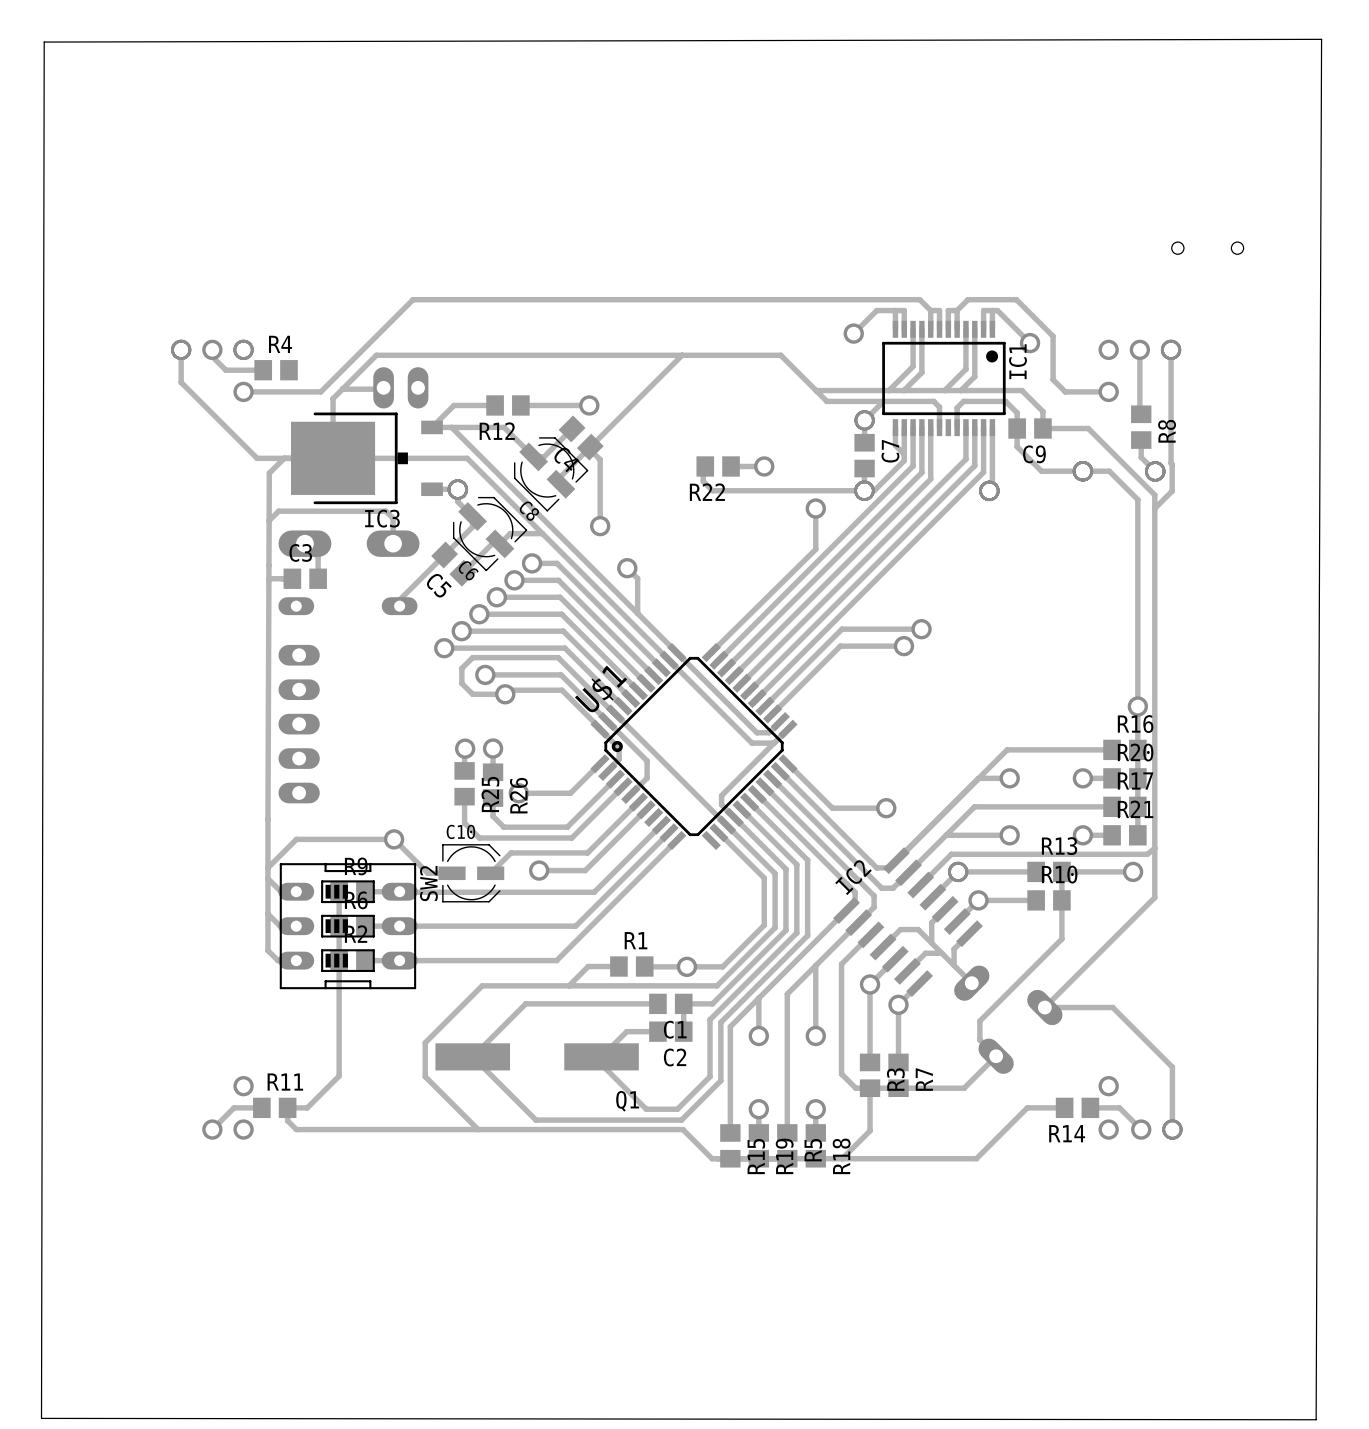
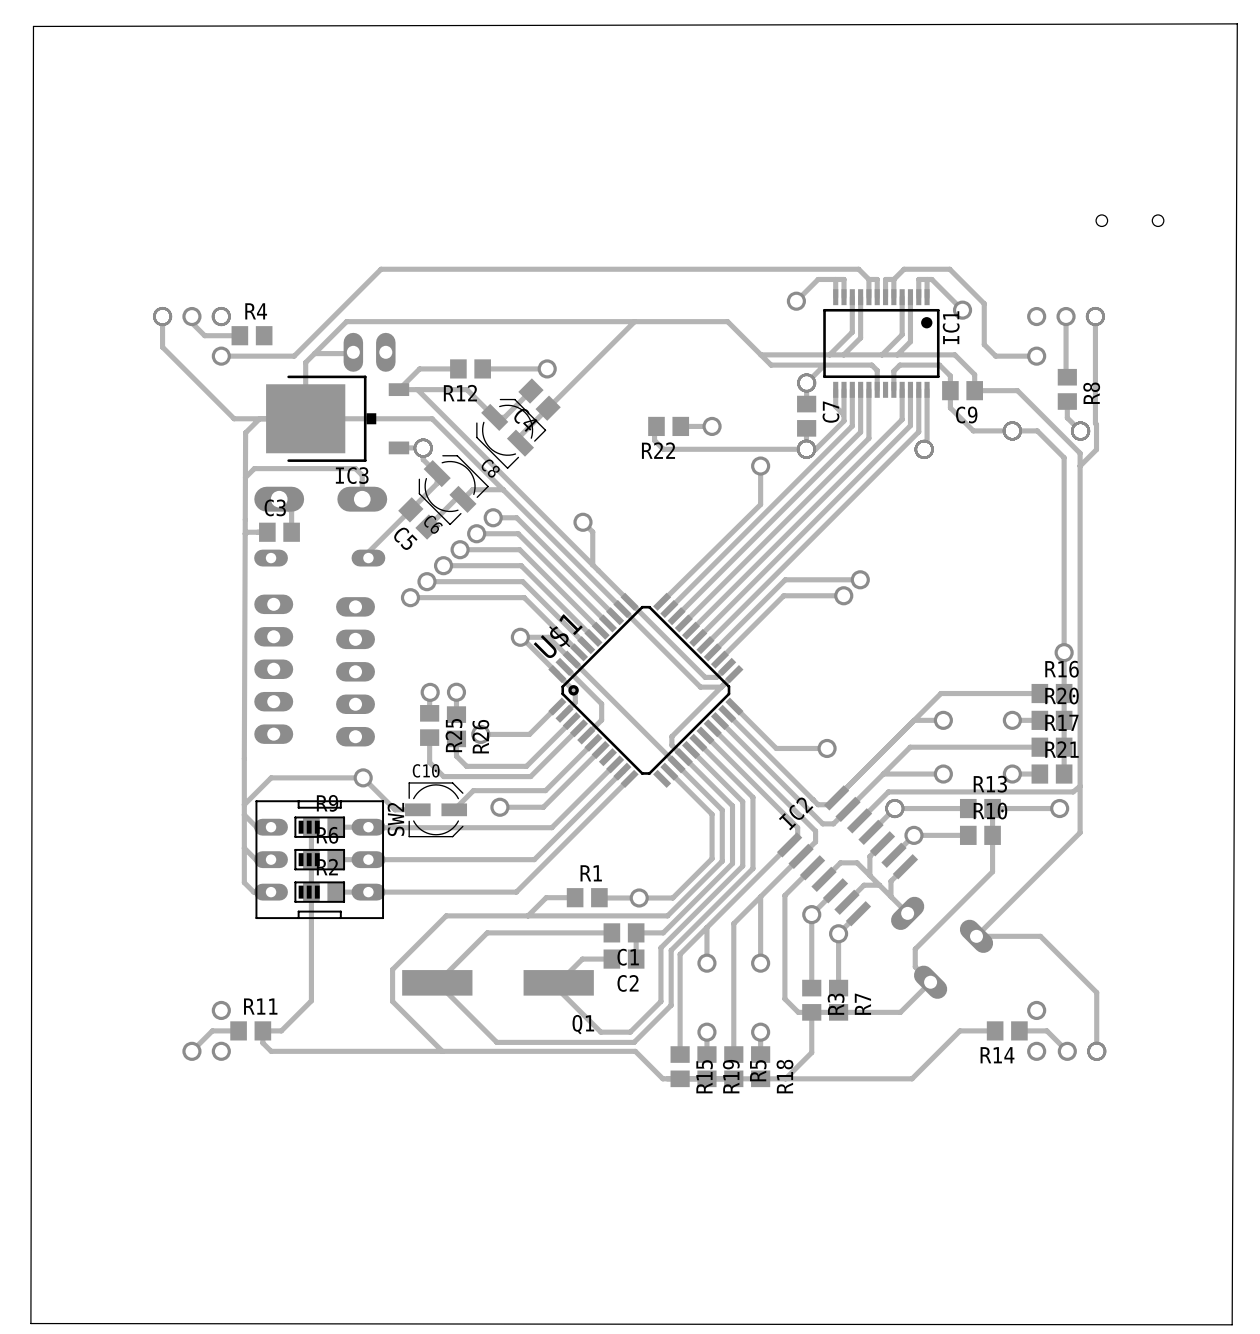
track: (588, 448) (600, 459) (600, 526) -> none
via: (600, 526) -> none
track: (485, 674) (561, 674) (607, 721) -> none
via: (485, 674) -> none
track: (560, 690) (509, 690) (505, 694) (472, 694) (461, 683) (461, 668) (472, 657) (558, 657) (590, 690) -> (521, 637) (548, 637)
via: none -> (520, 637)
via: (505, 694) -> none
part: none -> (355, 671)

